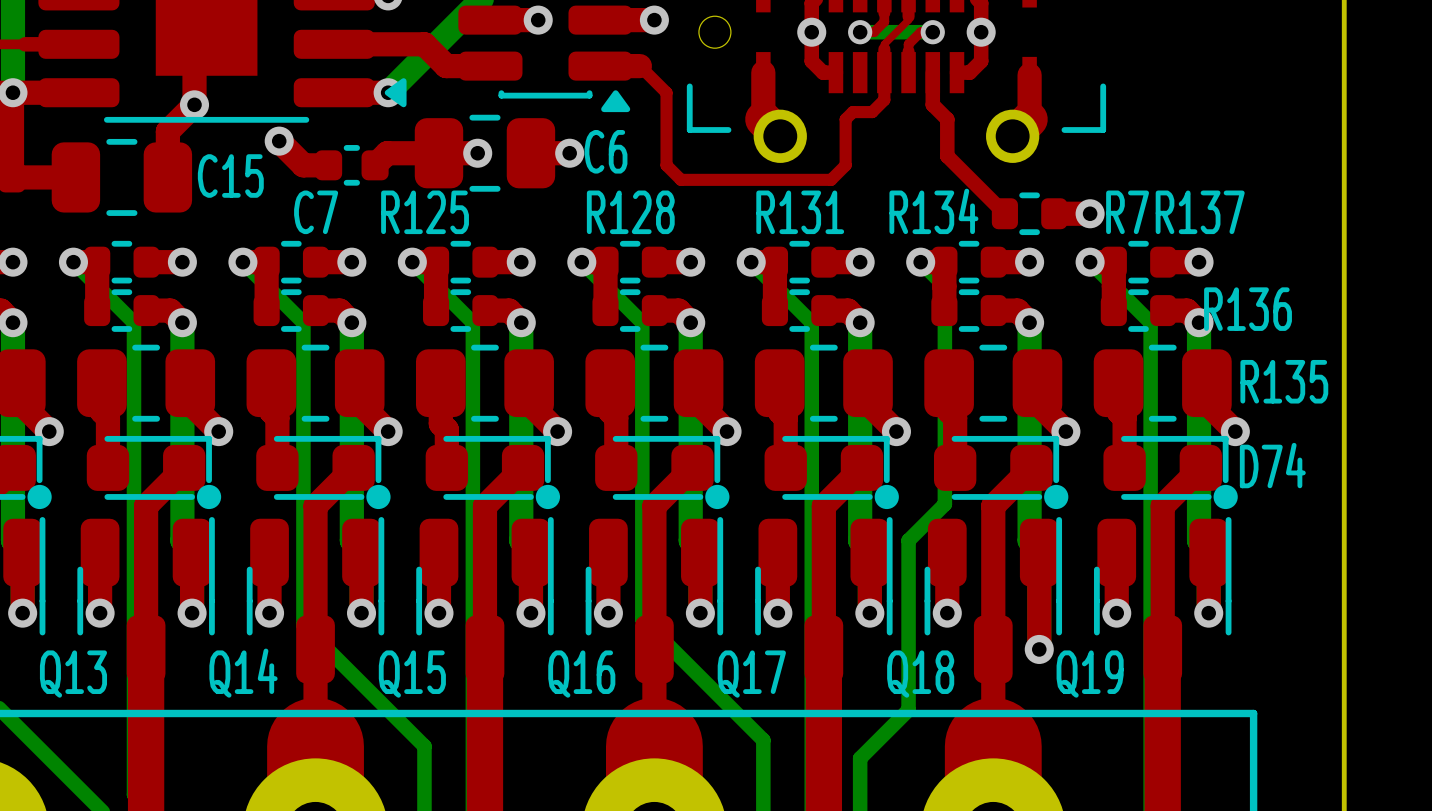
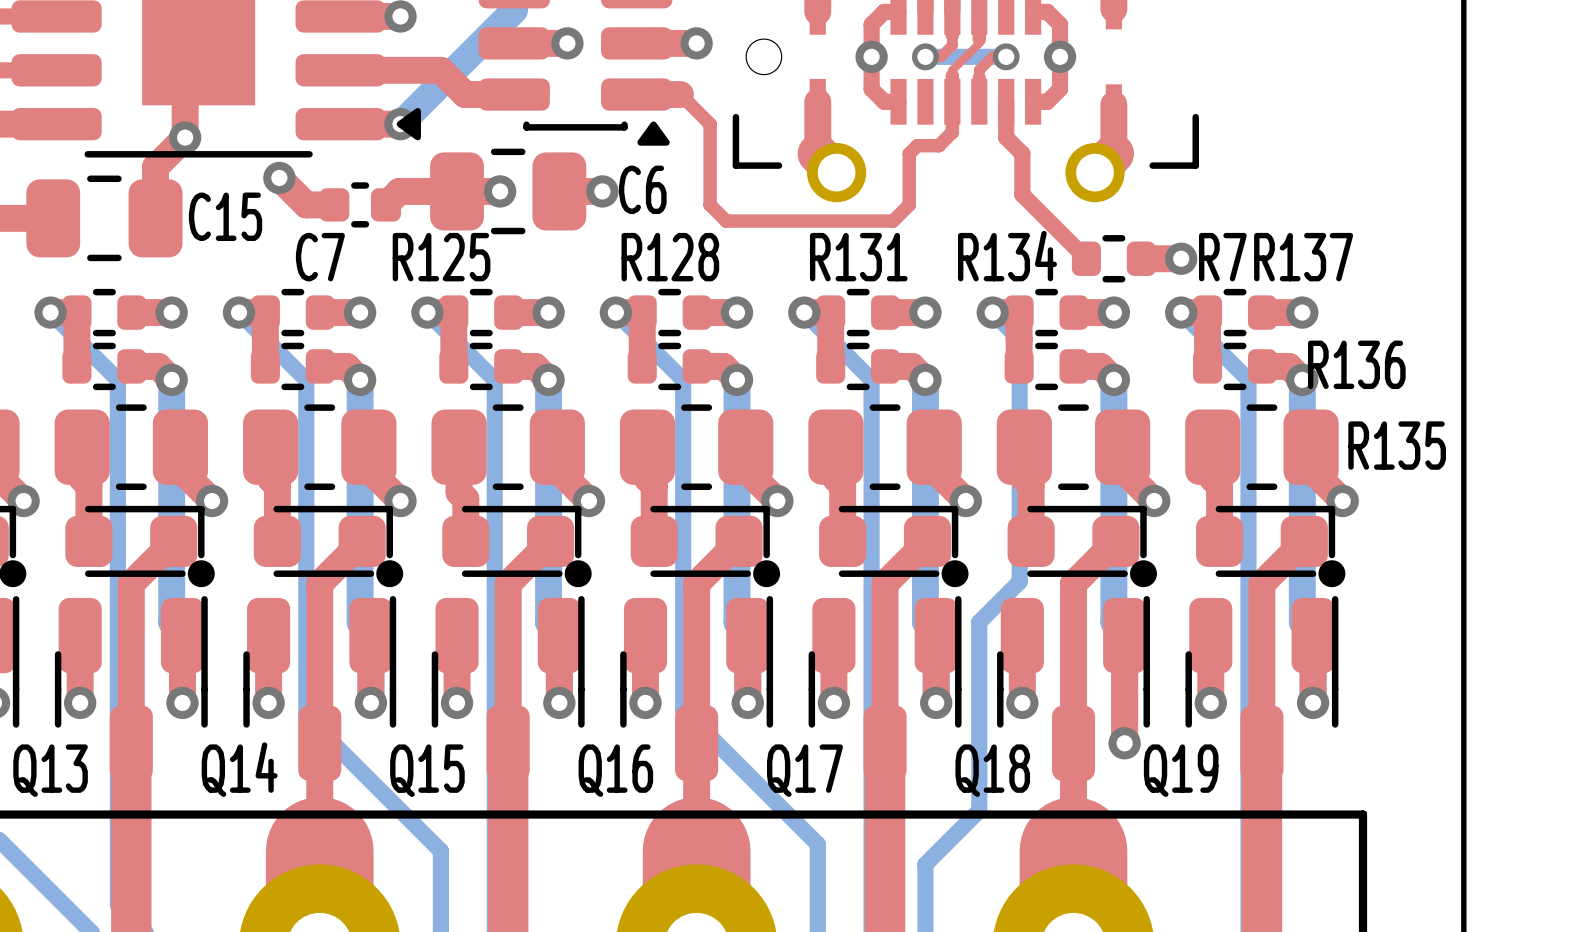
D74 name: D74 (1272, 465) -> none

